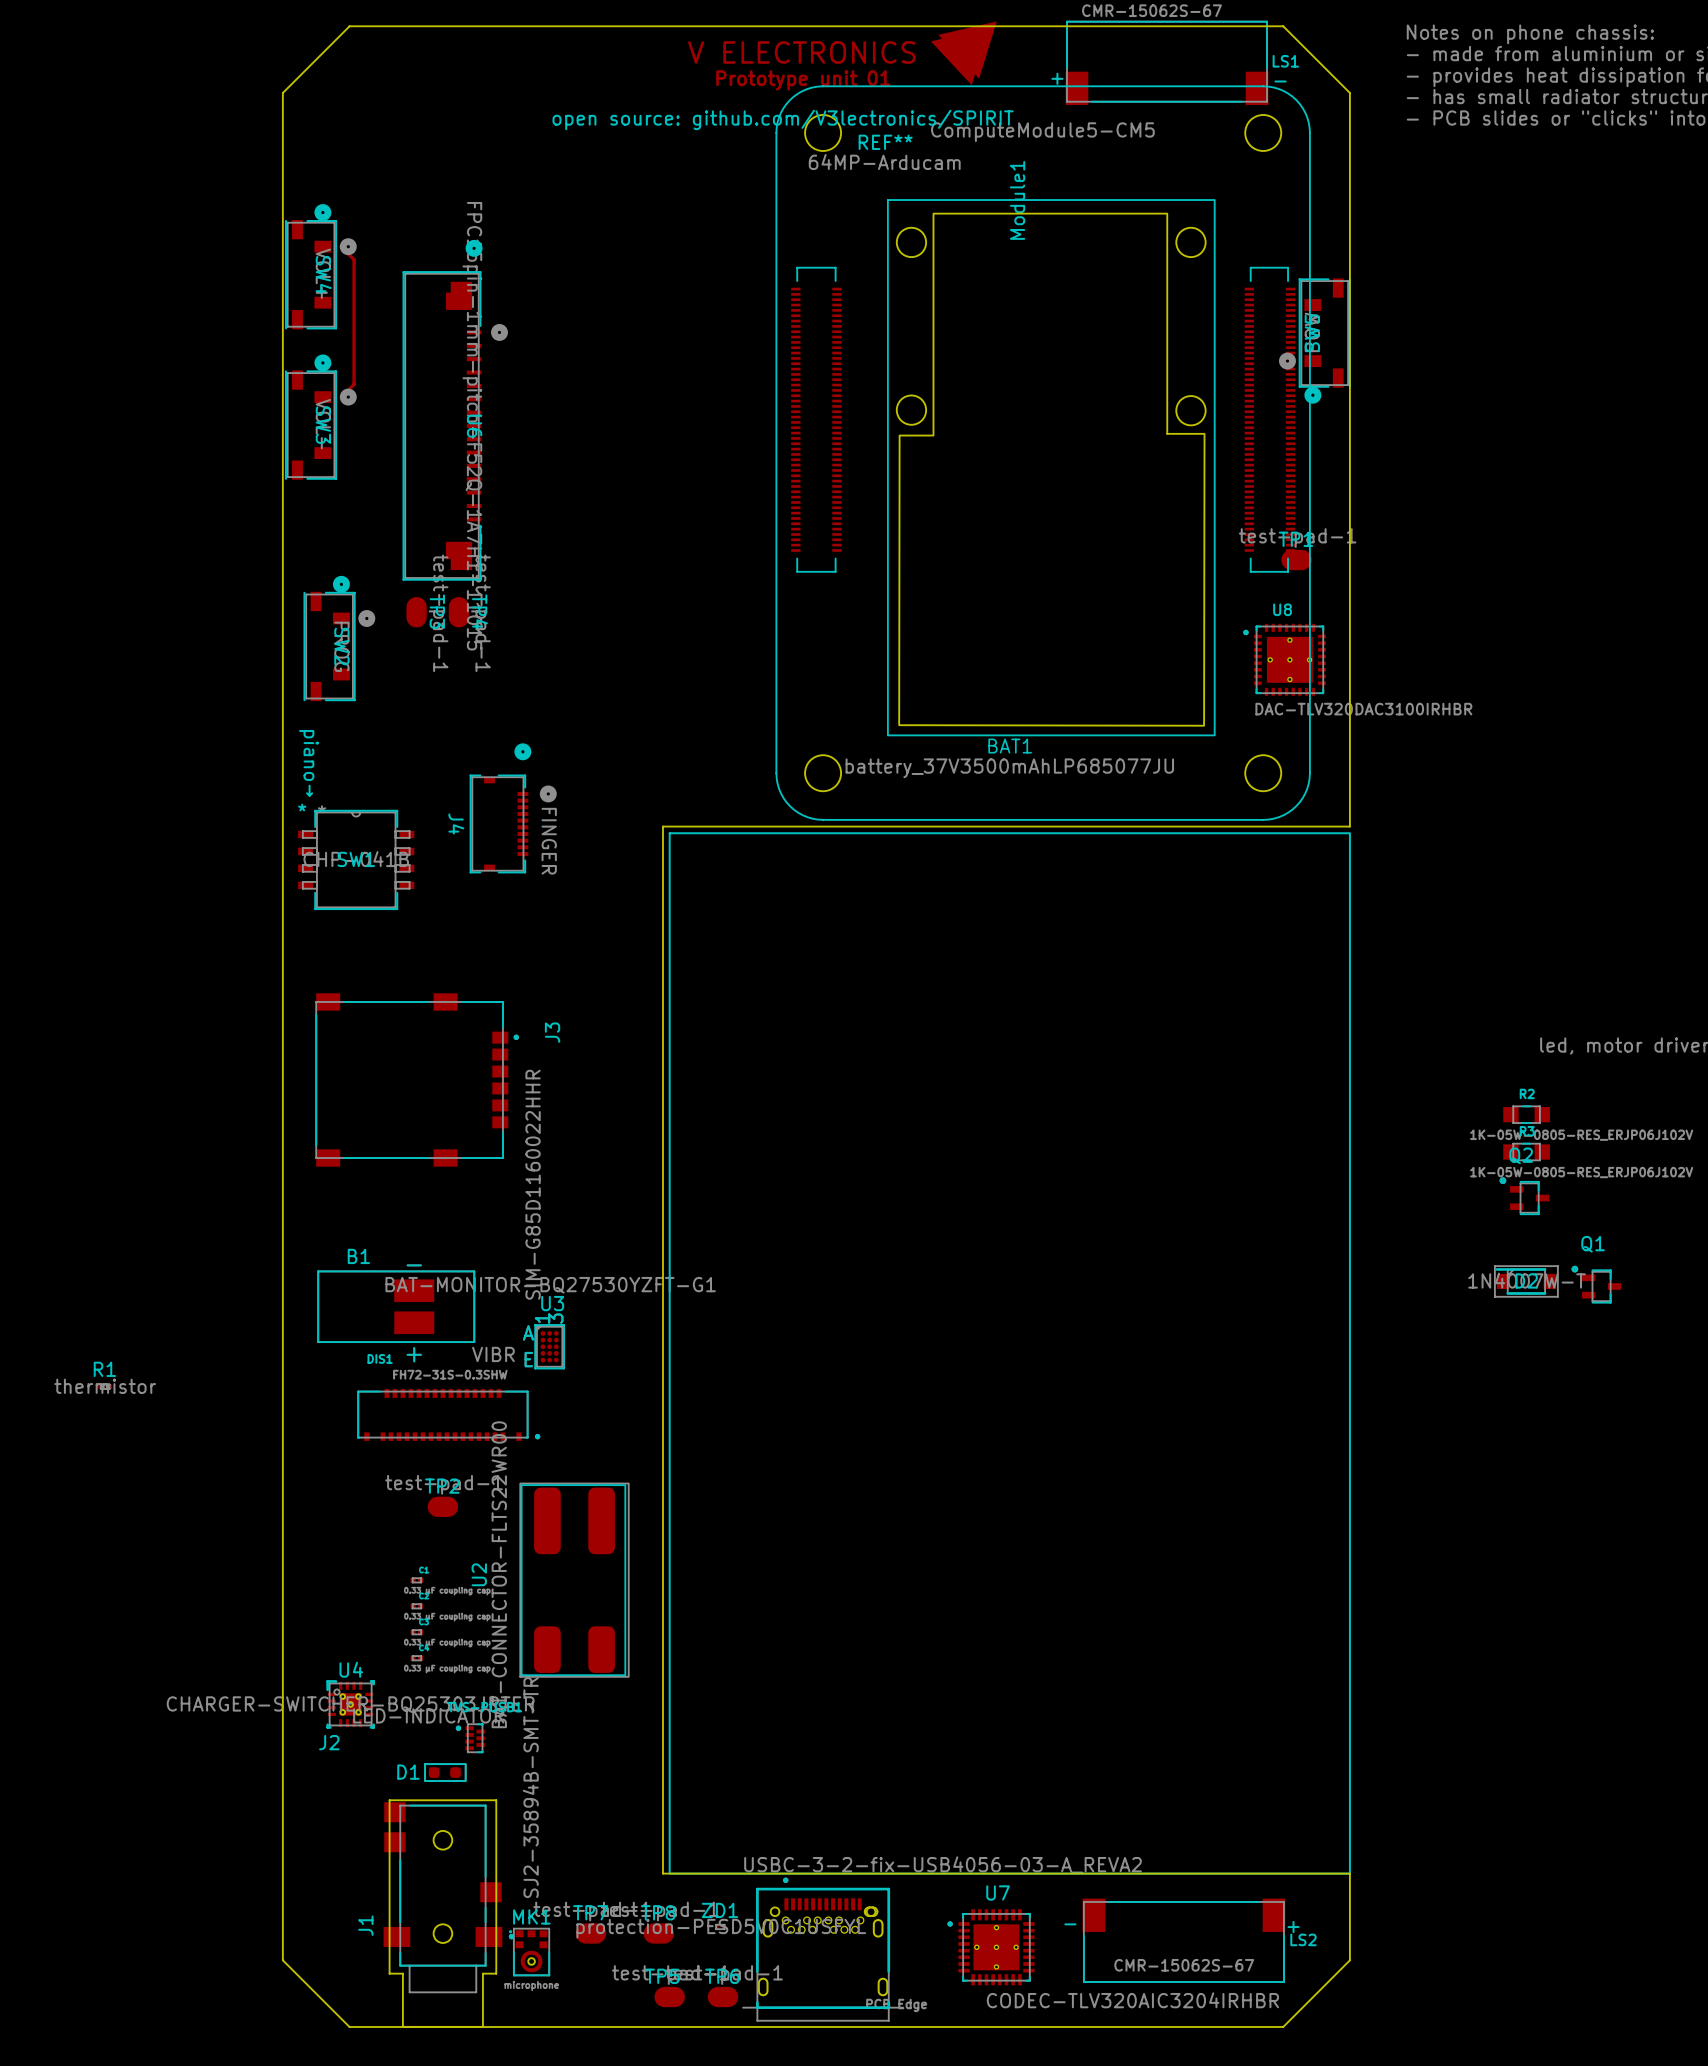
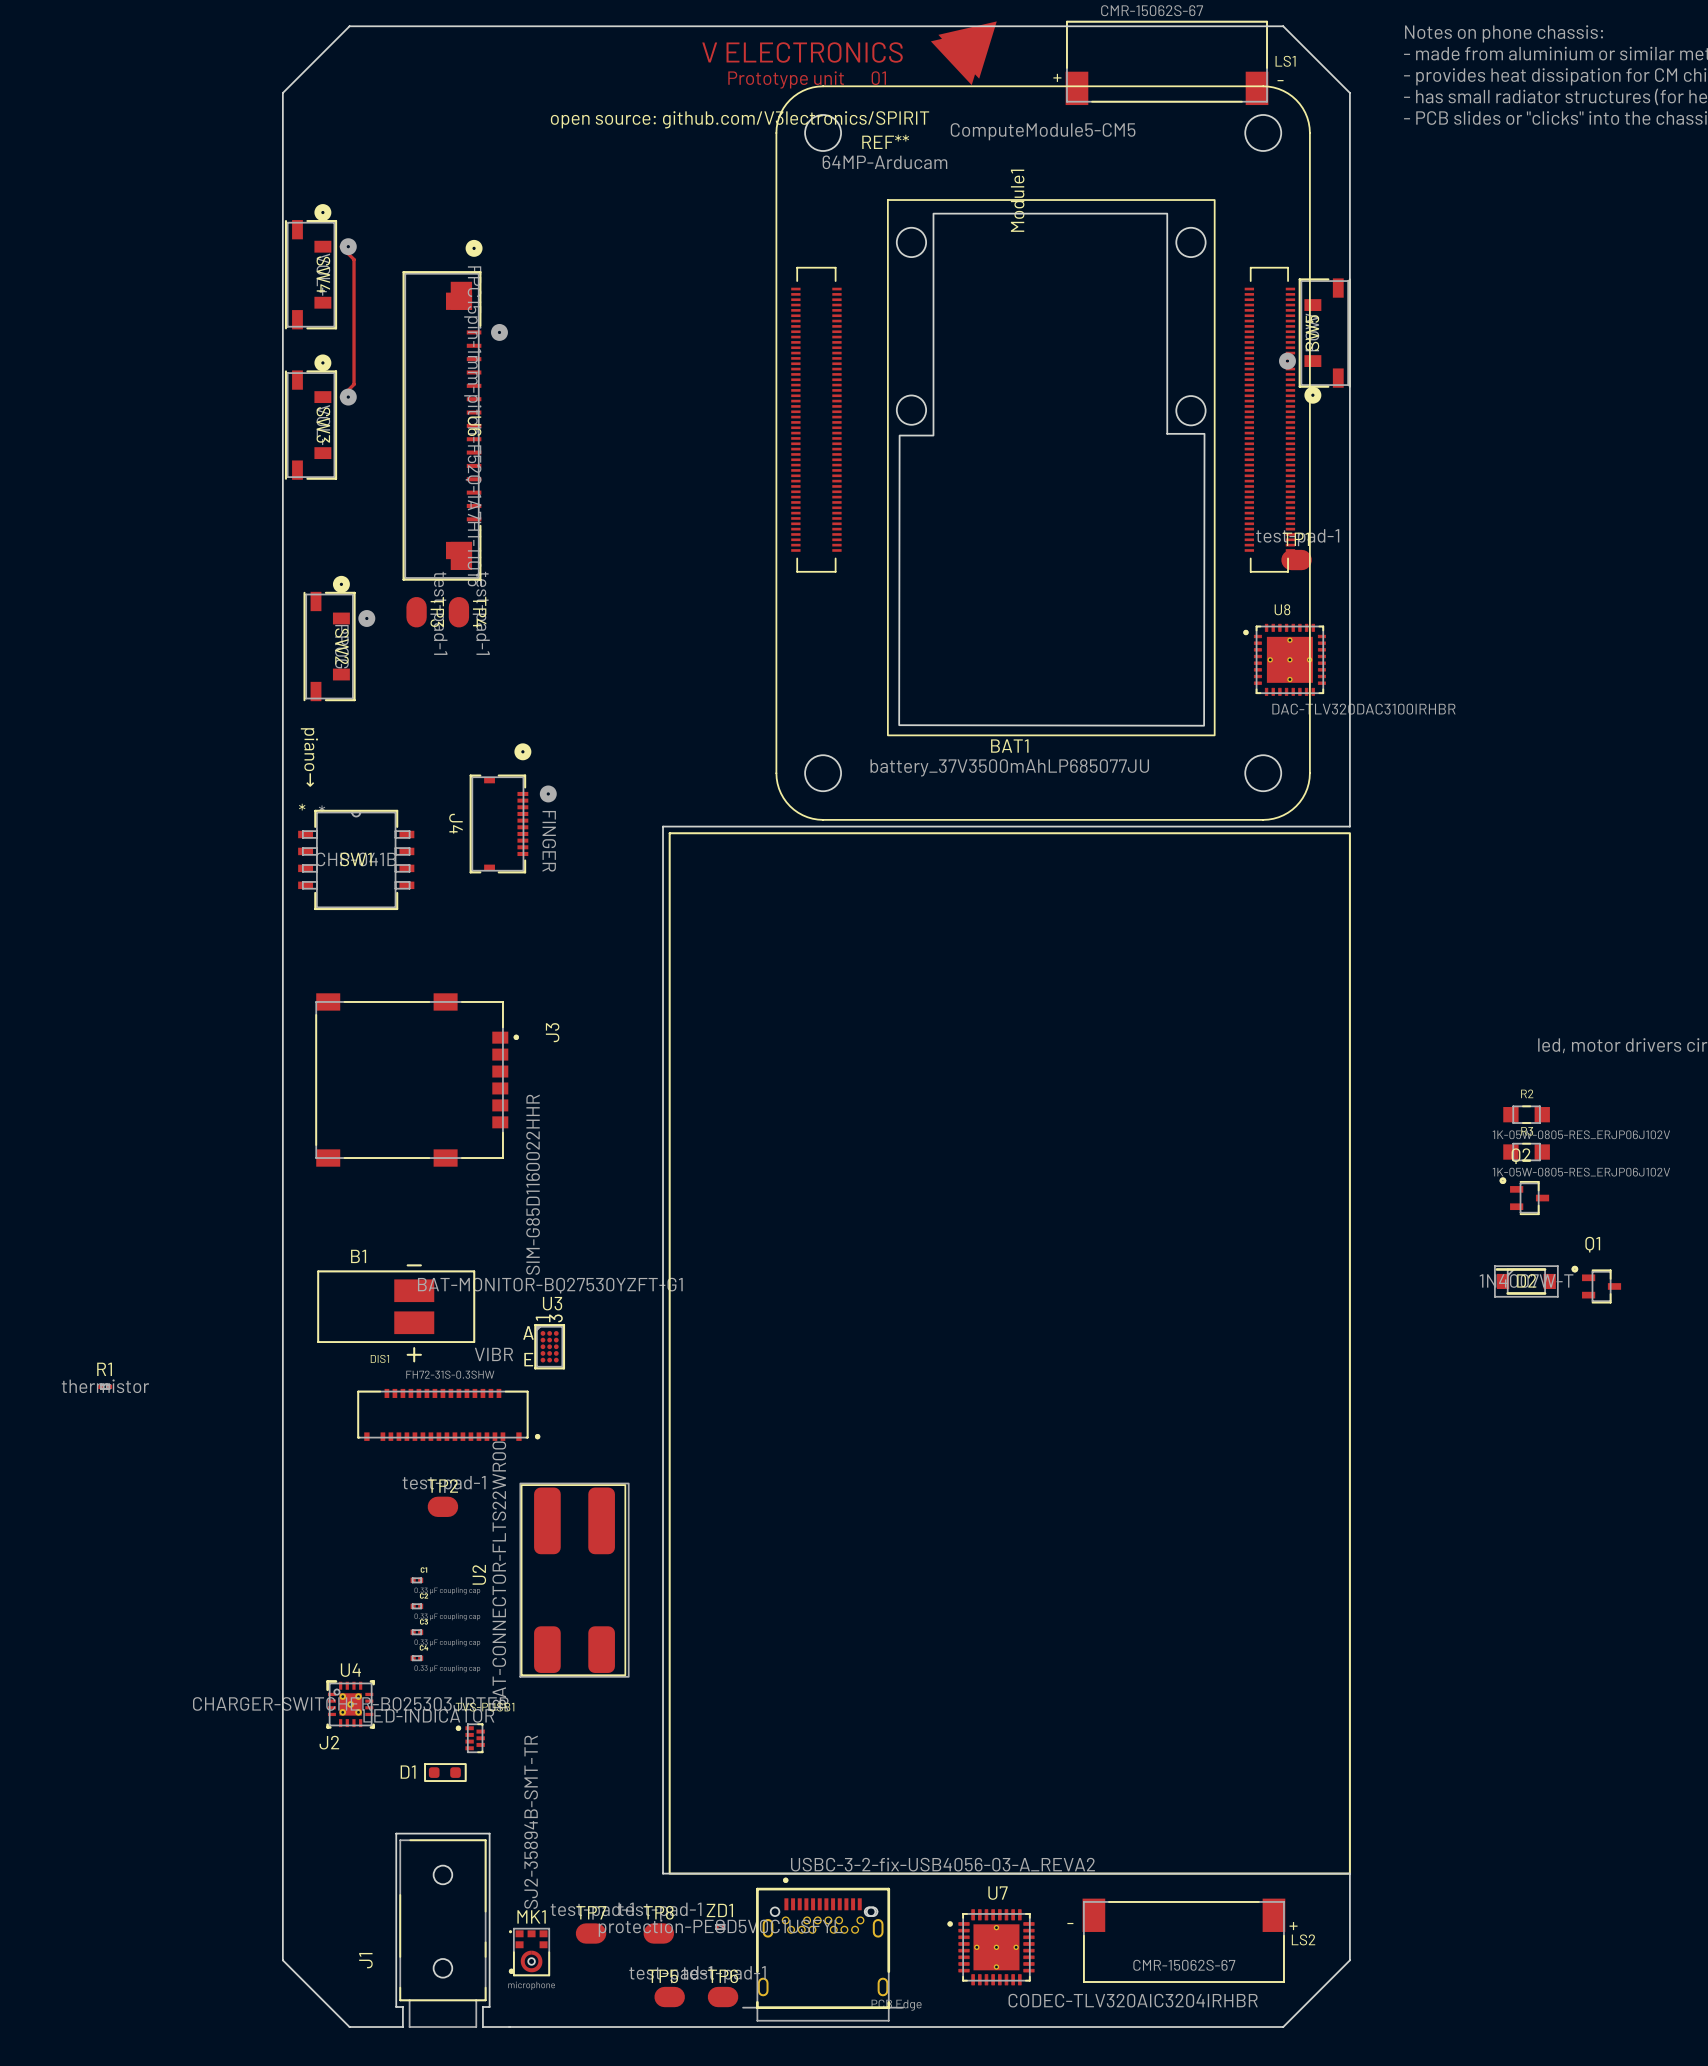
J1 footprint: [383, 1802, 515, 1994] -> [399, 1839, 515, 2028]
board edge: (402, 2007) (402, 1973) (389, 1973) (389, 1800) (496, 1800) (496, 1973) (482, 1973) (482, 2007) -> (402, 2007) (396, 2007) (396, 1833) (489, 1833) (489, 2007) (482, 2007)

